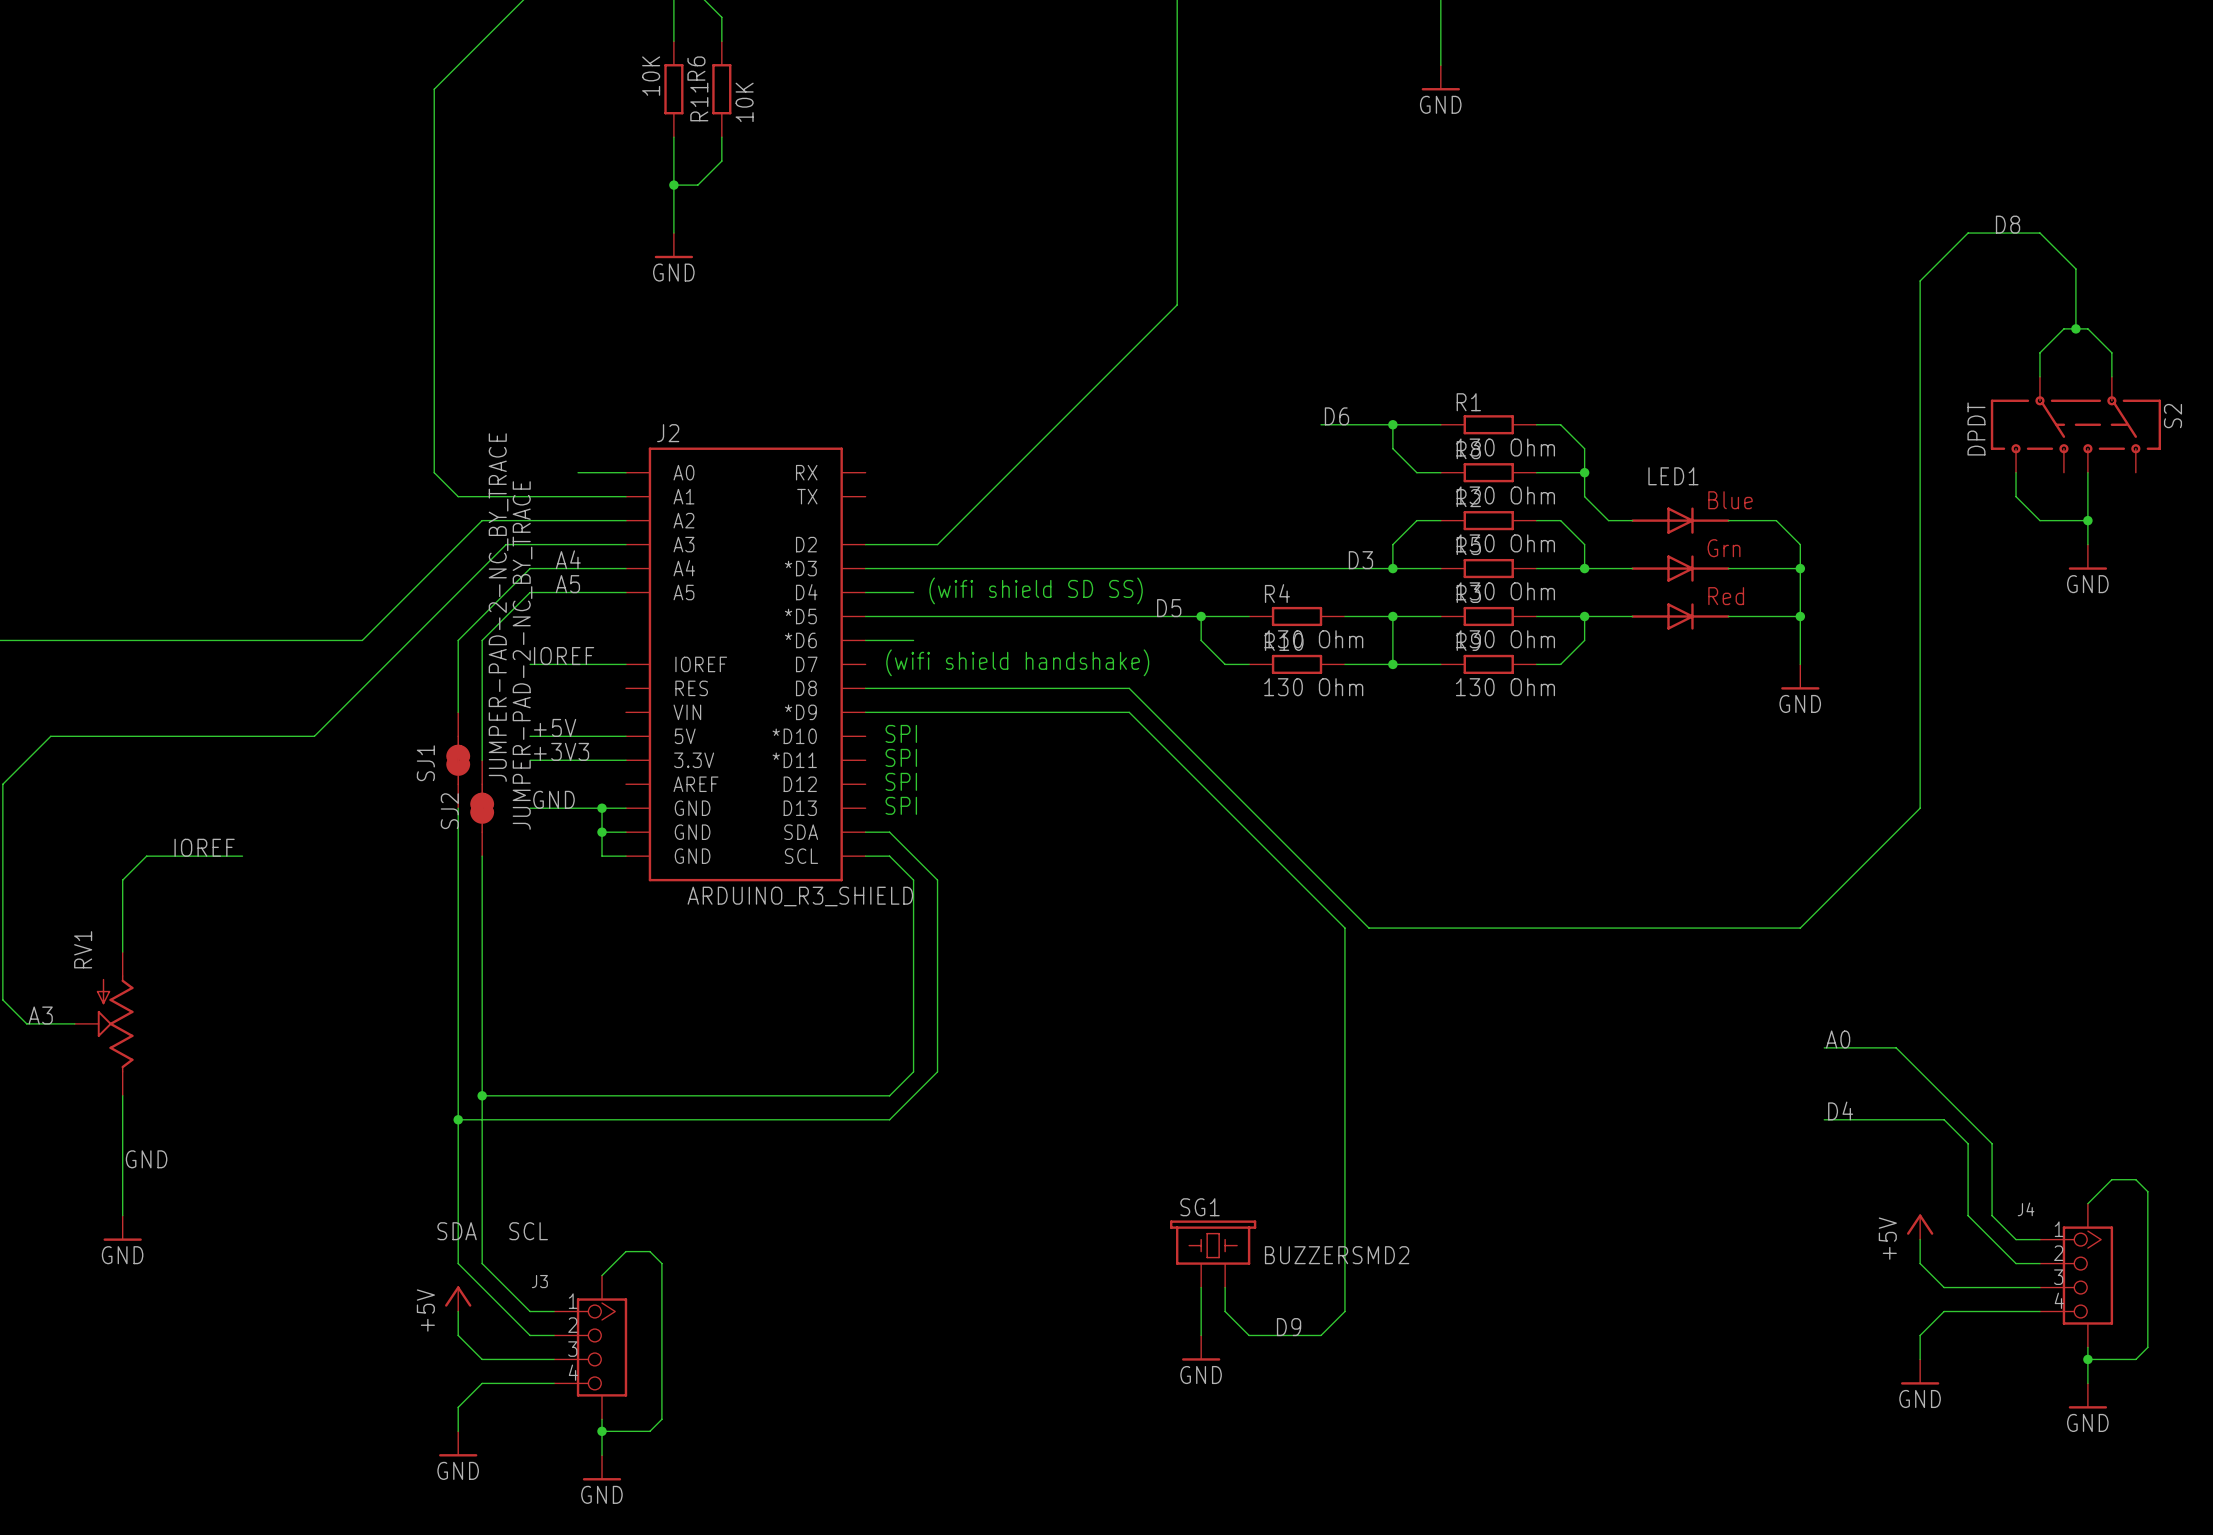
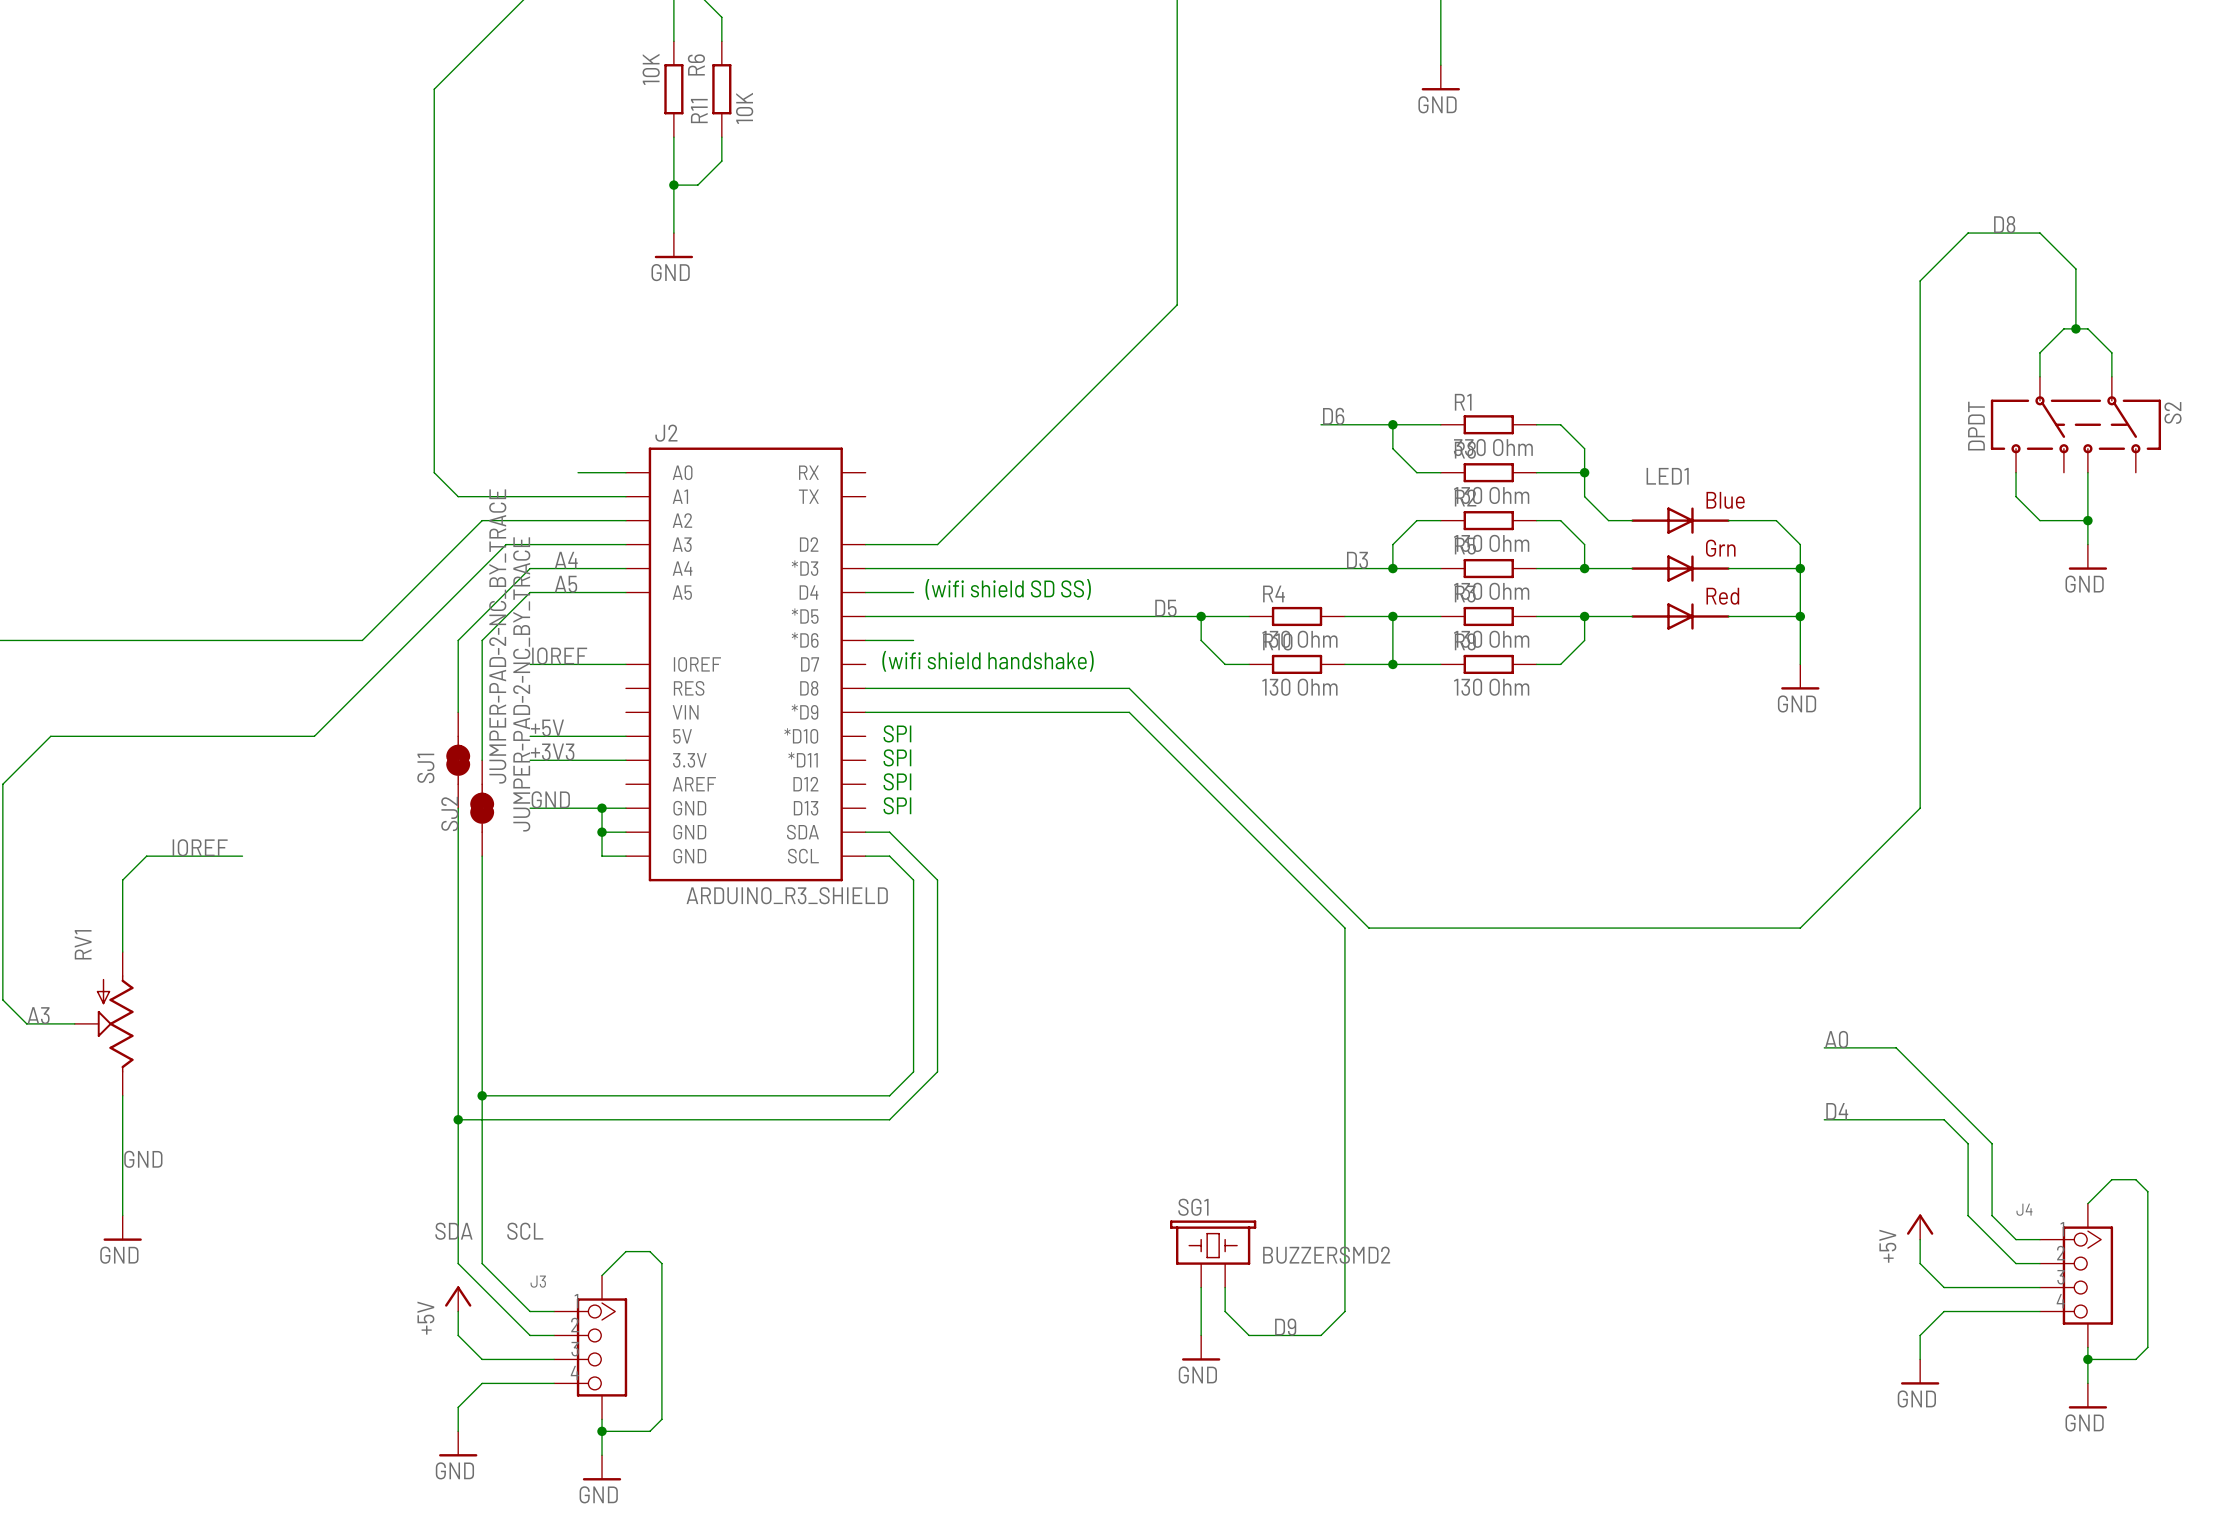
R1 value: 130 Ohm (1505, 447) -> 330 Ohm (1493, 447)

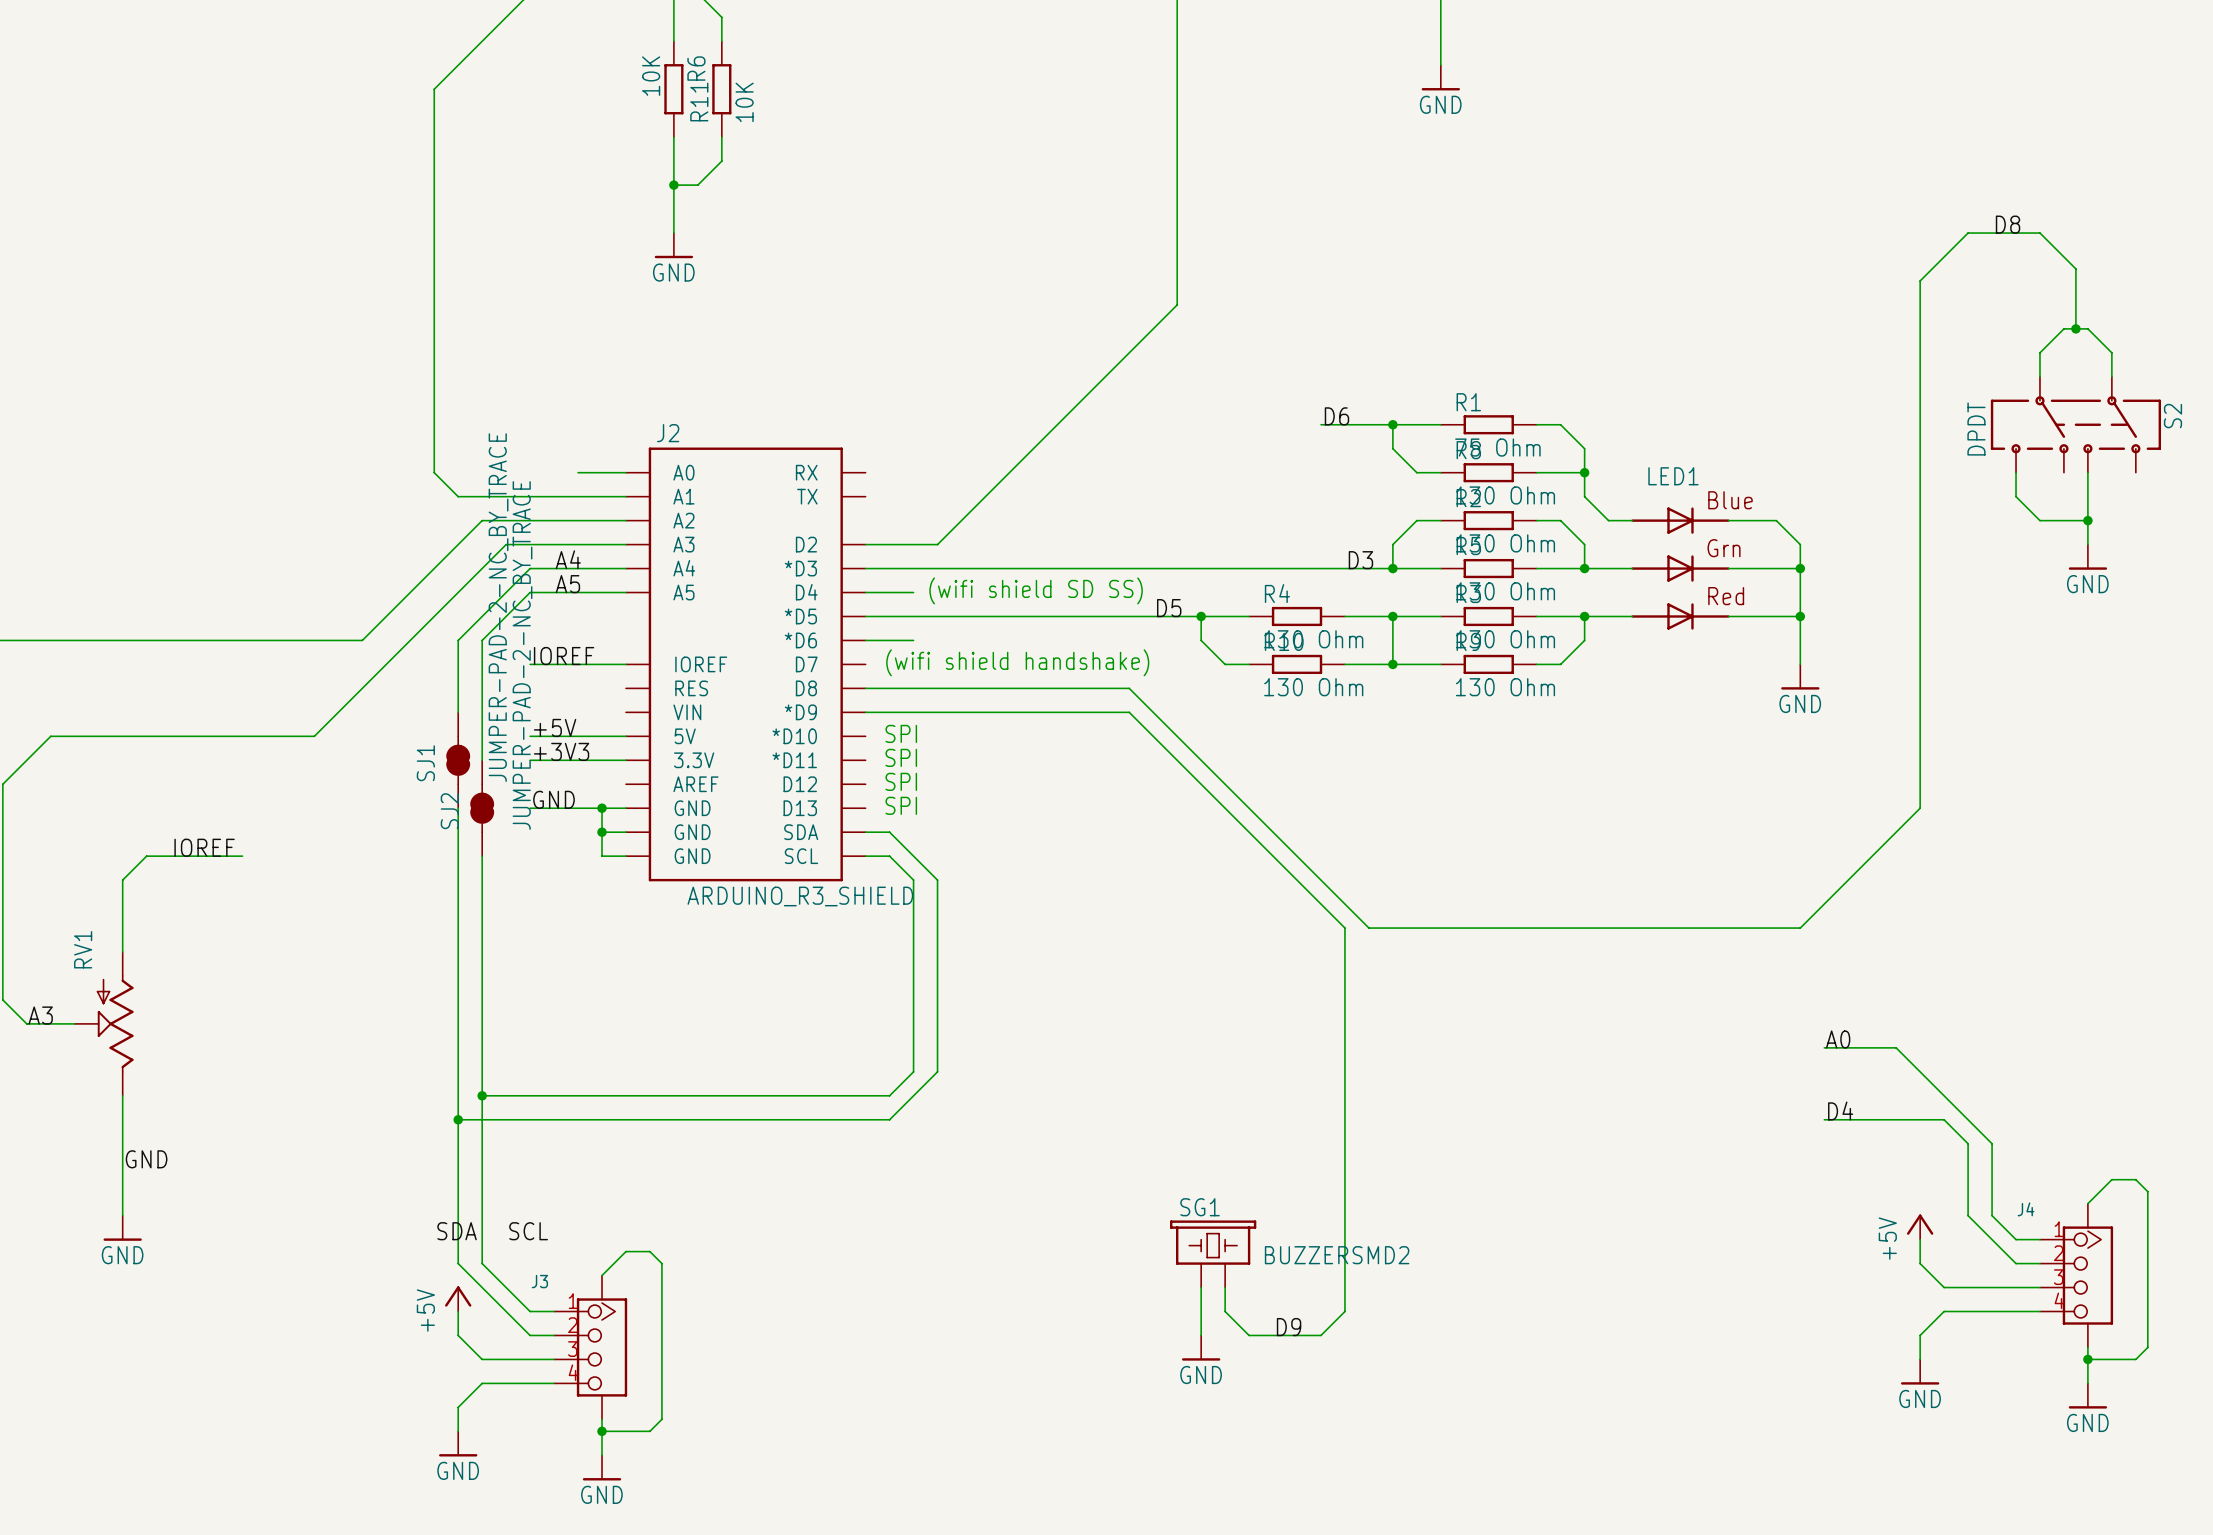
R1 value: 330 Ohm (1493, 447) -> 75 Ohm (1497, 447)

